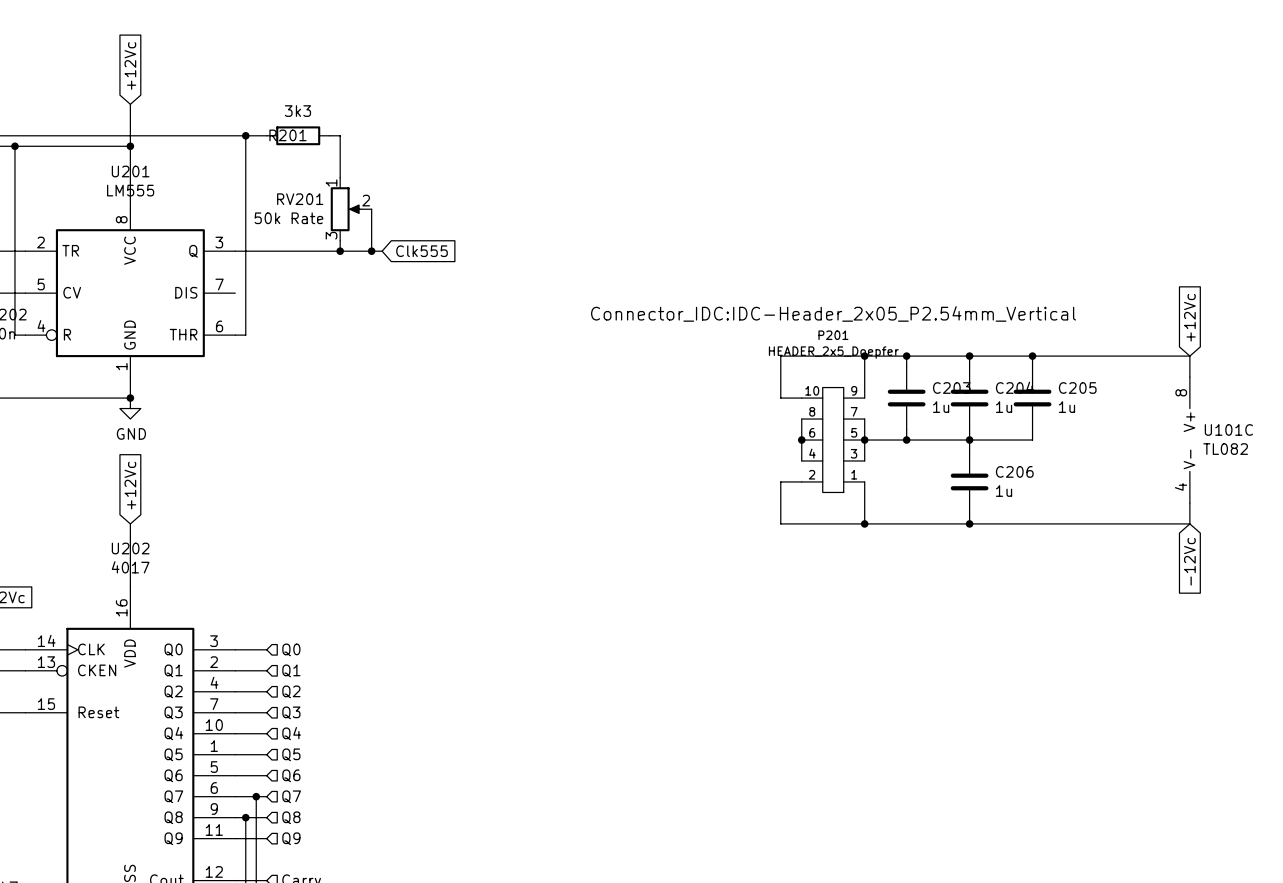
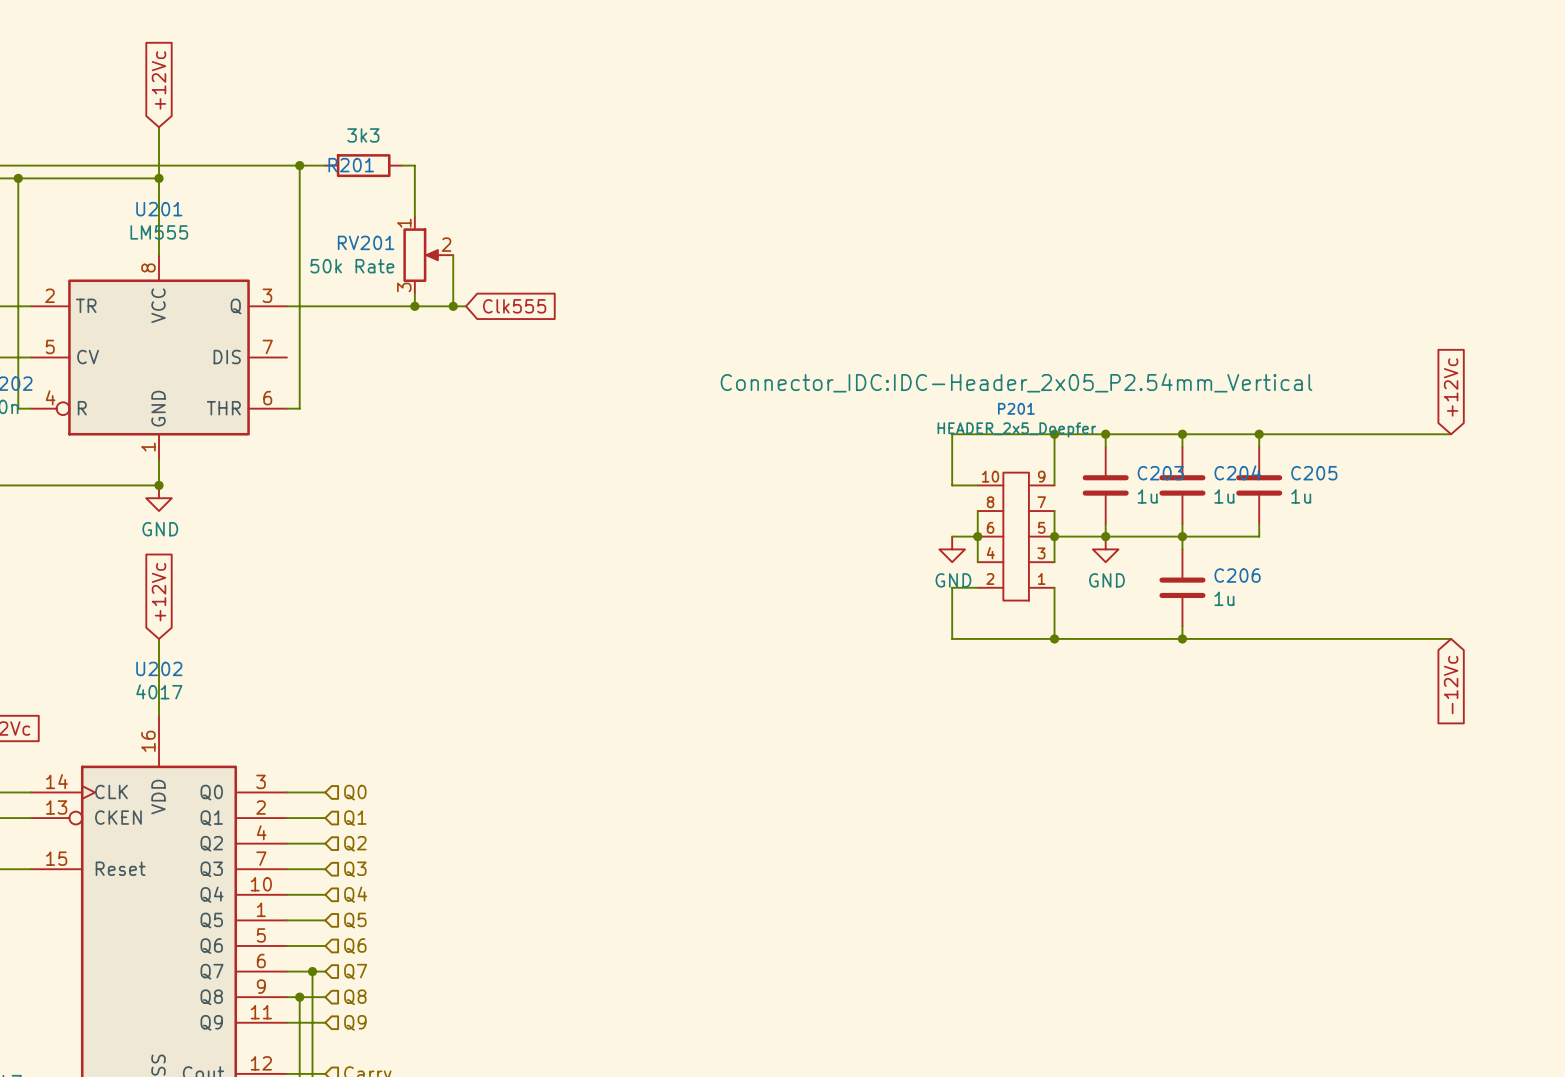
wire: (1189, 356) (1189, 377) -> none
wire: none -> (952, 536) (977, 536)
U101C: TL082 (1189, 440) -> none
power symbol: none -> GND (952, 549)
power symbol: none -> GND (1105, 549)
wire: (1189, 502) (1189, 523) -> none

